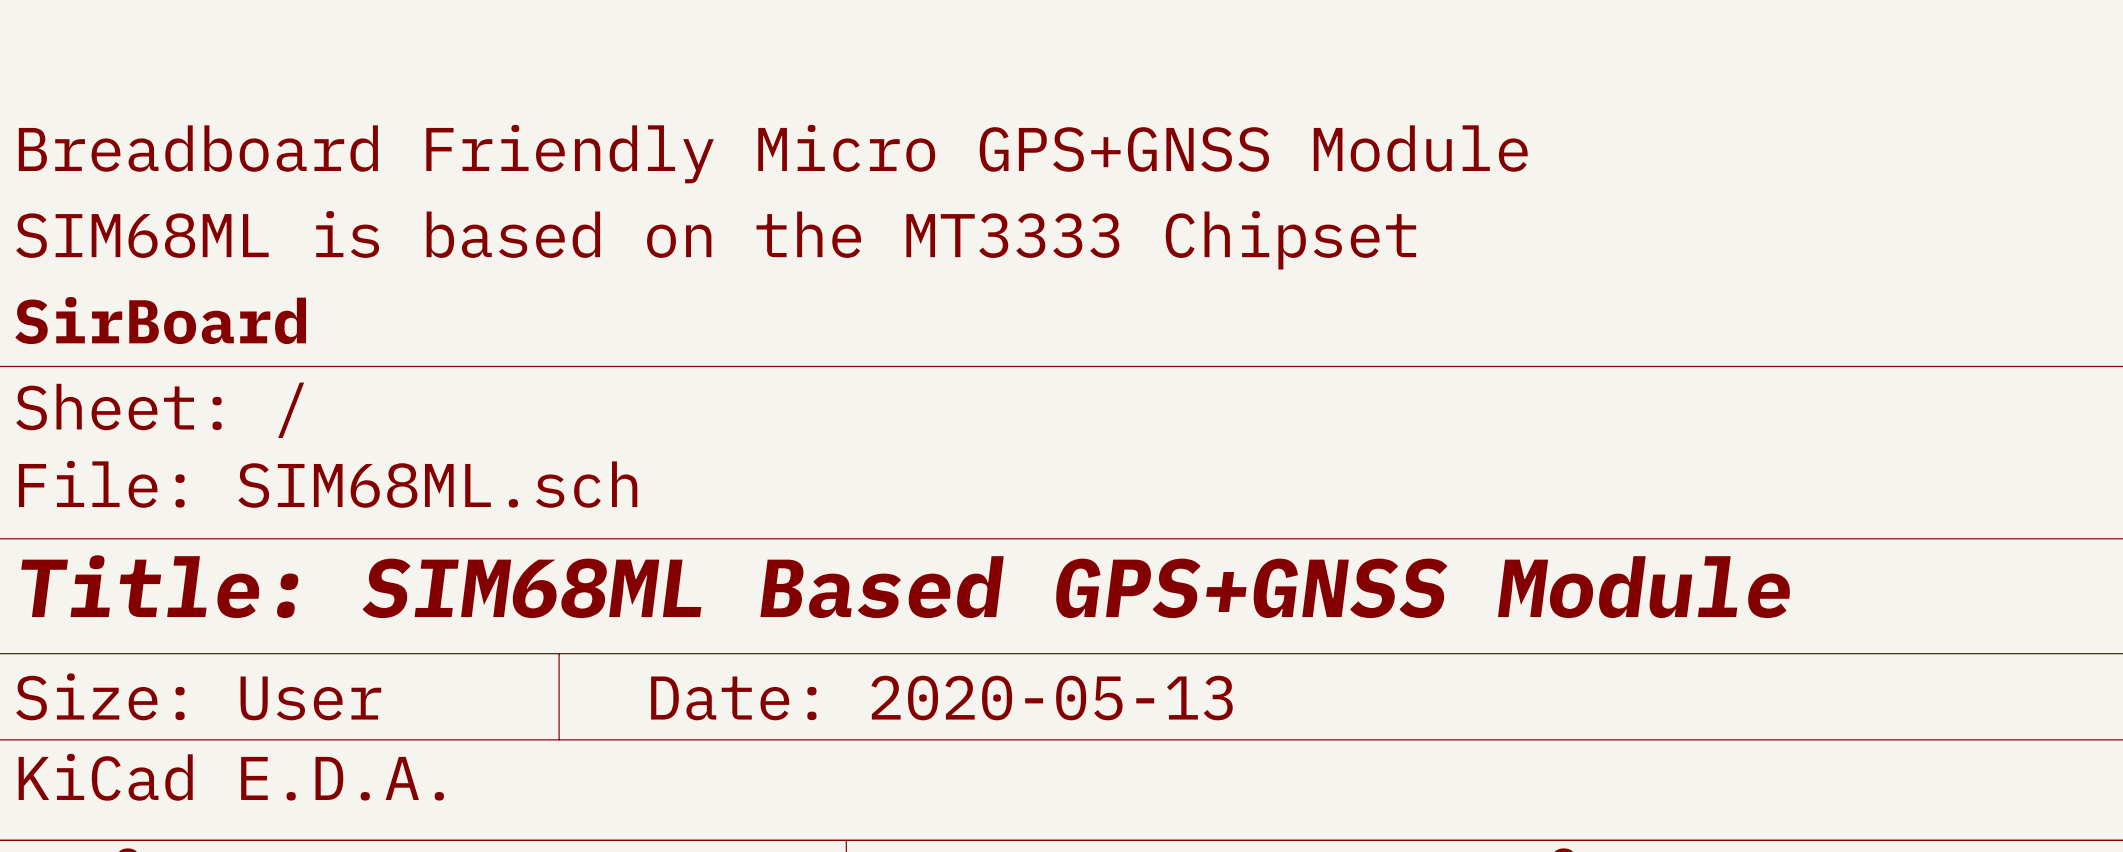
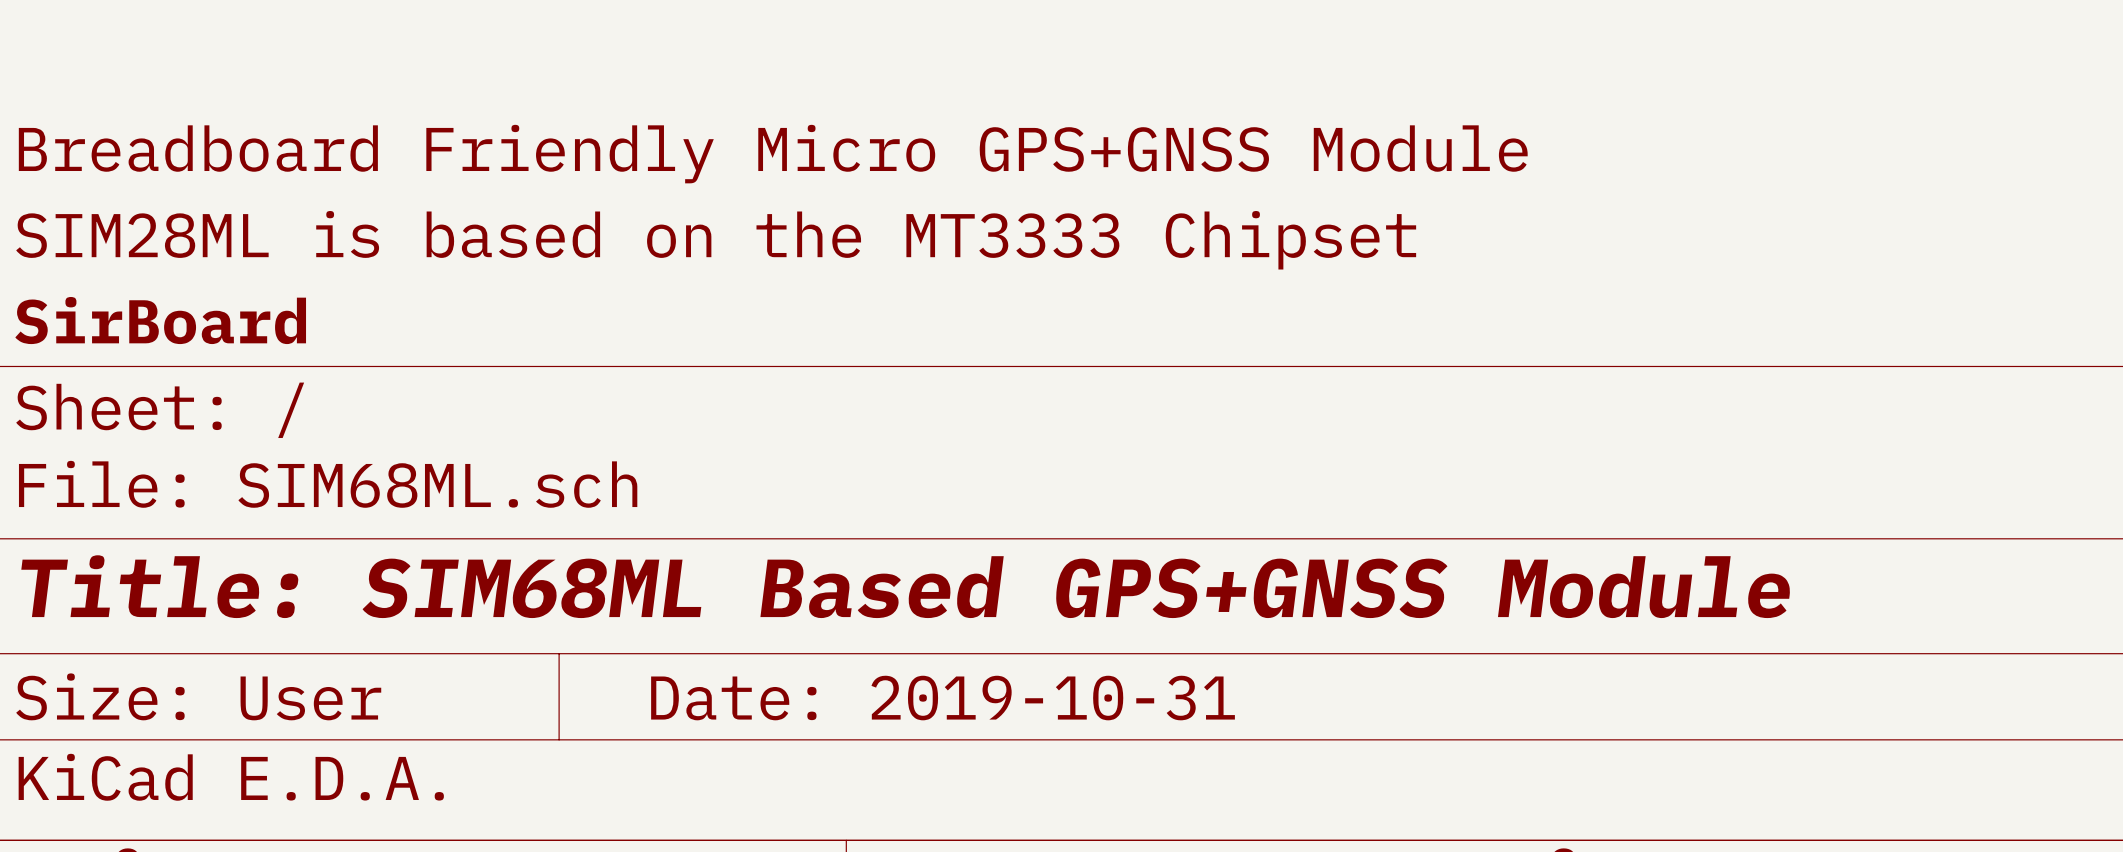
title block: SIM68ML is based on the MT3333 Chipset (716, 240) -> SIM28ML is based on the MT3333 Chipset (716, 240)
title block: Date: 2020-05-13 (941, 698) -> Date: 2019-10-31 (943, 698)

